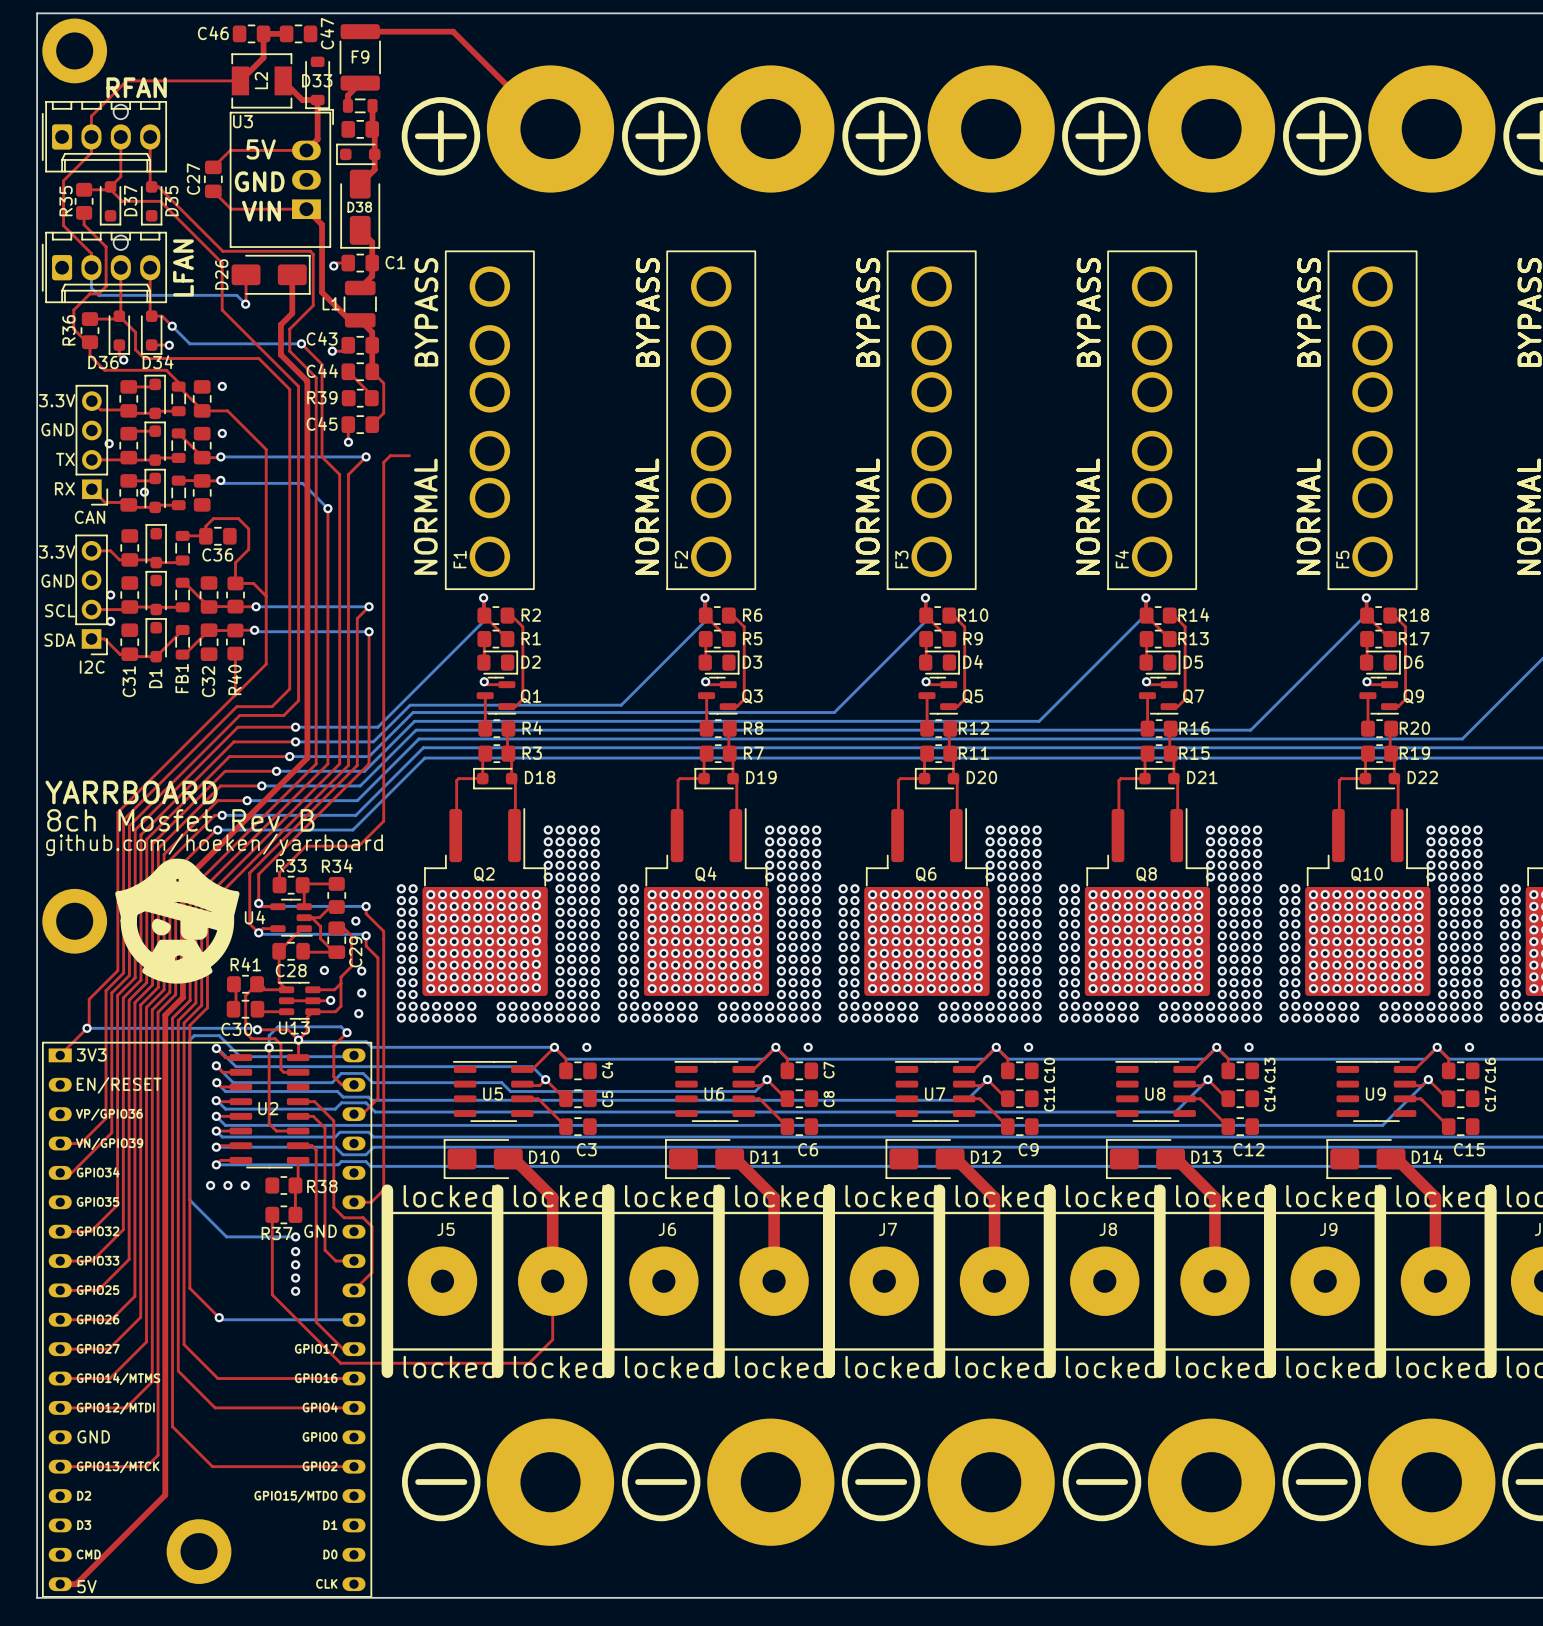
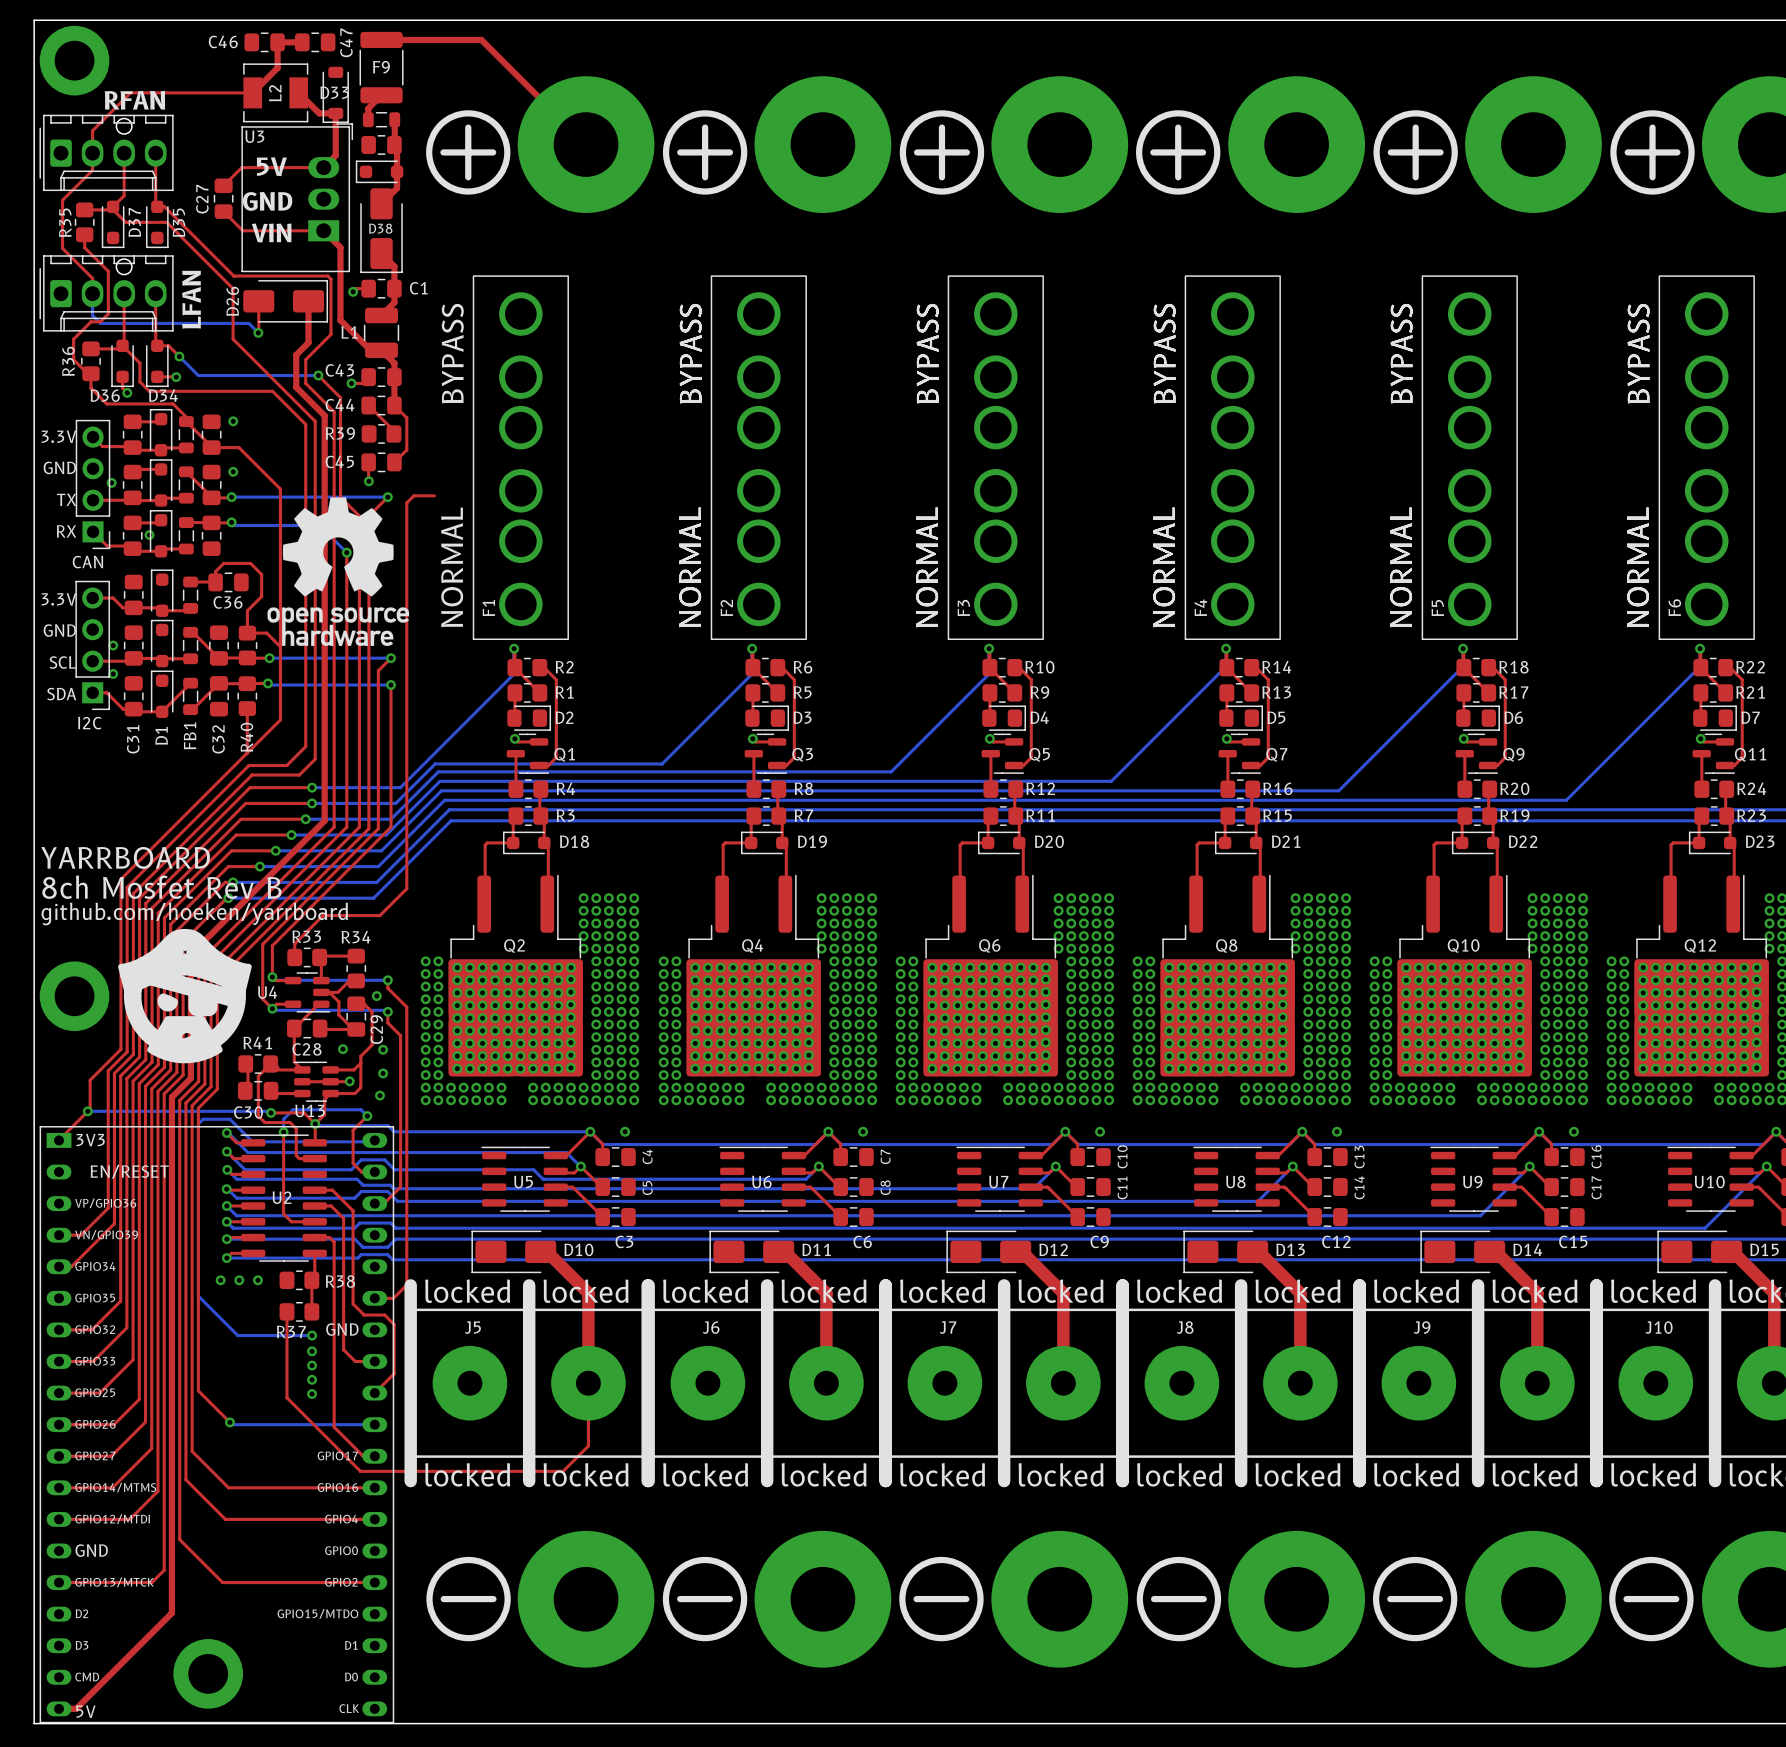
drawing: none -> [267, 497, 410, 647]

